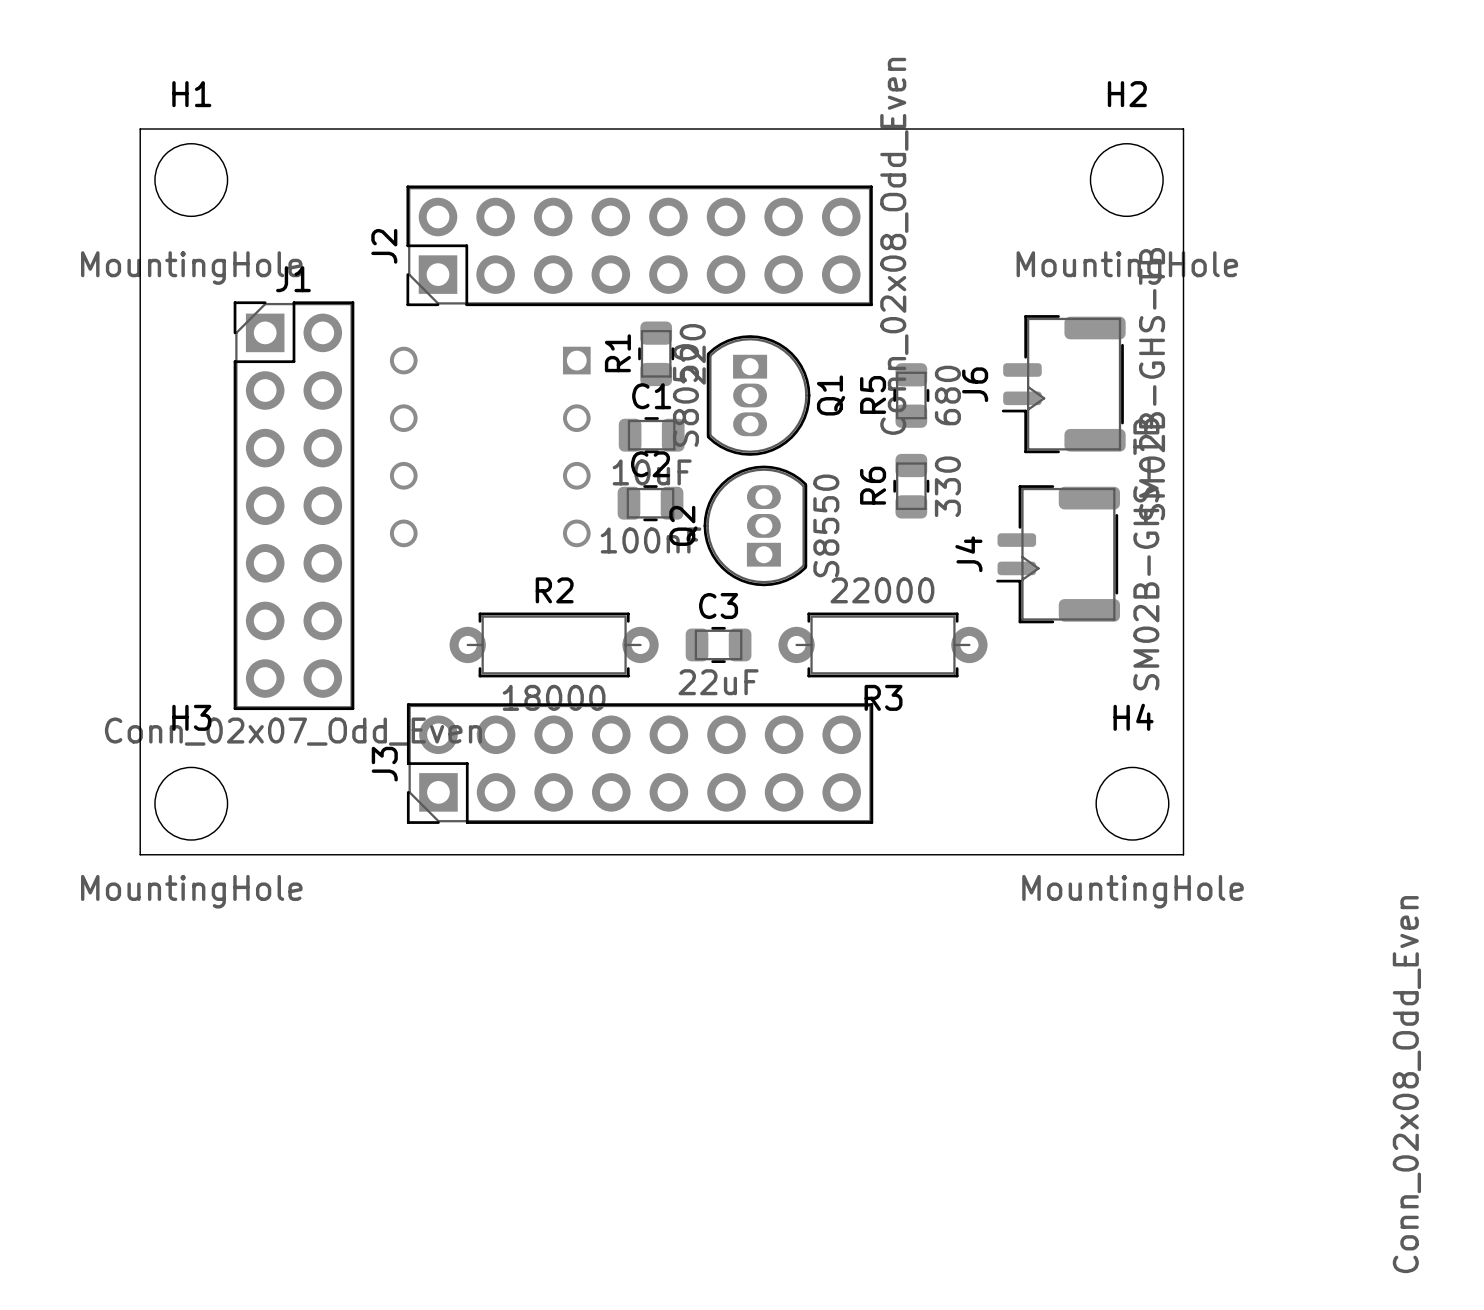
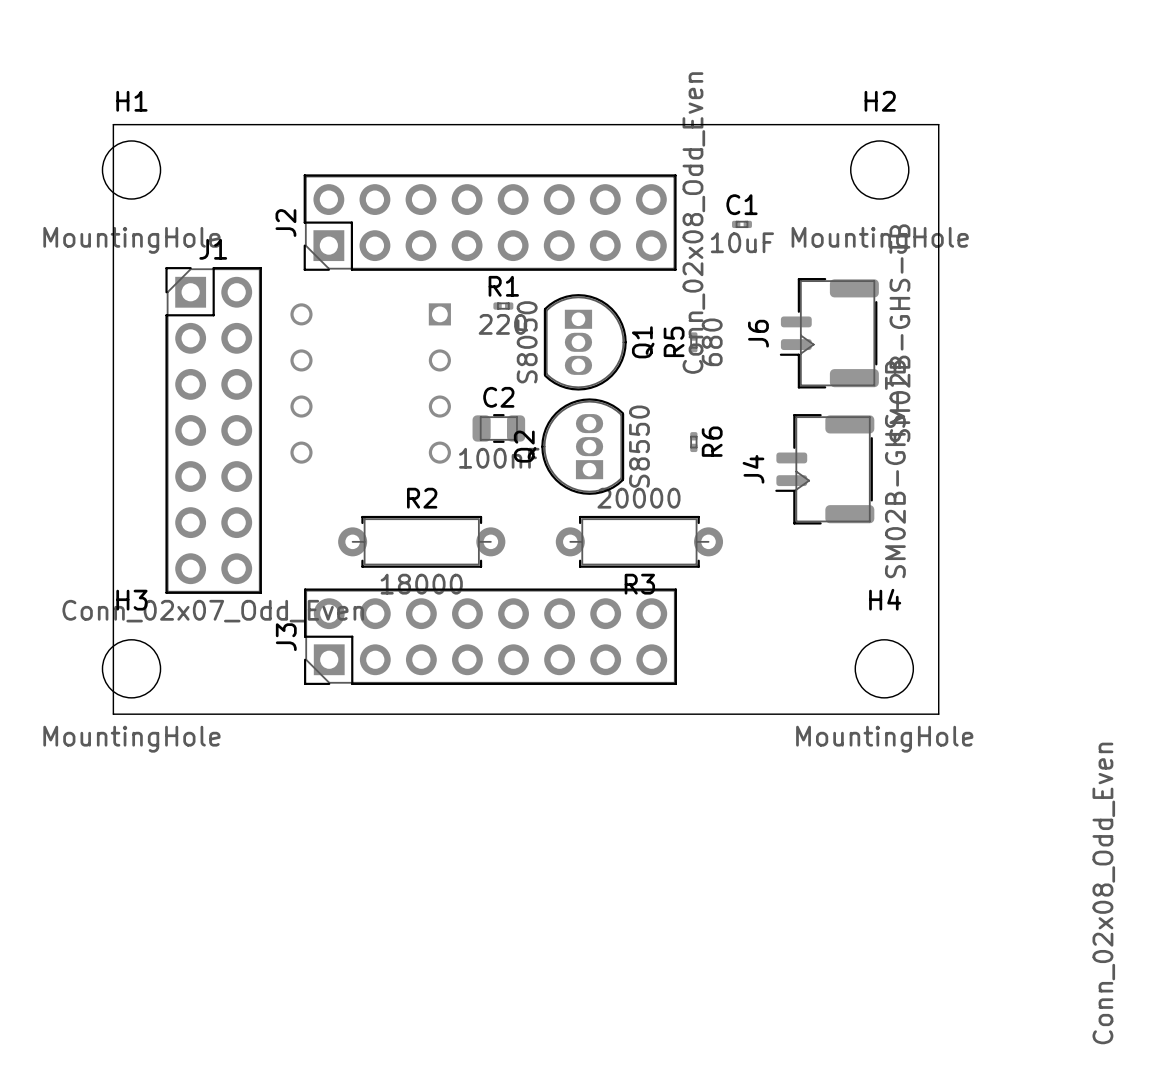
board edge: (140, 129) (1183, 129) (1183, 854) (140, 854) (140, 129) -> (113, 124) (113, 714) (938, 714) (938, 124) (113, 124)
R1 footprint: [638, 321, 675, 387] -> [493, 302, 514, 310]
R5 footprint: [893, 363, 930, 428] -> [690, 332, 698, 353]
C1 footprint: [618, 417, 685, 454] -> [732, 220, 752, 229]
R6 footprint: [893, 453, 930, 519] -> [690, 432, 698, 453]
R6 name position: R6 (873, 485) -> R6 (712, 441)
R6 value: 330 (947, 486) -> none
R3 value: 22000 (882, 590) -> 20000 (638, 498)
C3: 22uF (718, 644) -> none
R3 position: (882, 644) -> (639, 541)

